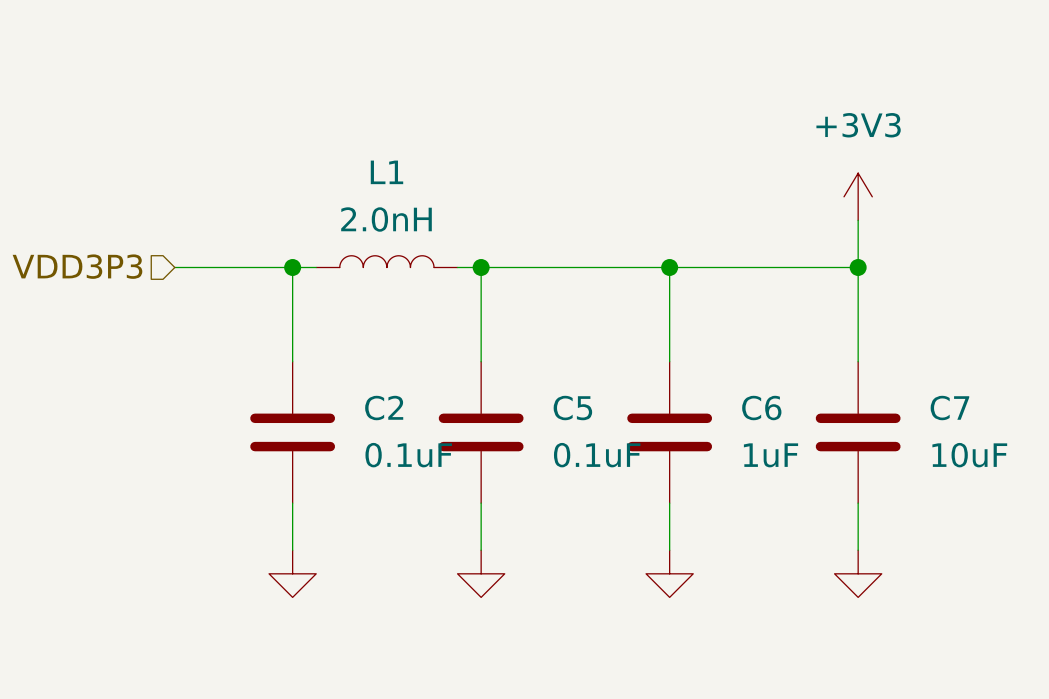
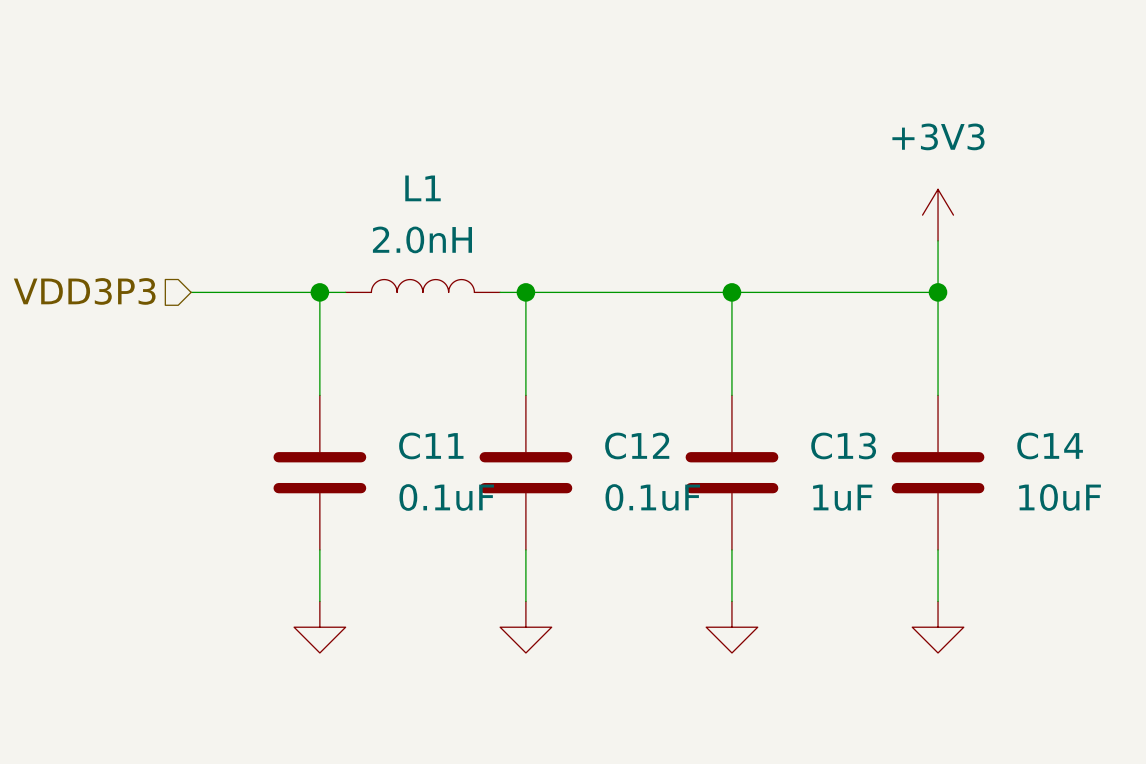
C2 name: C2 (384, 408) -> C11 (431, 445)
C5 name: C5 (572, 408) -> C12 (637, 445)
C6 name: C6 (761, 408) -> C13 (843, 445)
C7 name: C7 (949, 408) -> C14 (1050, 445)

